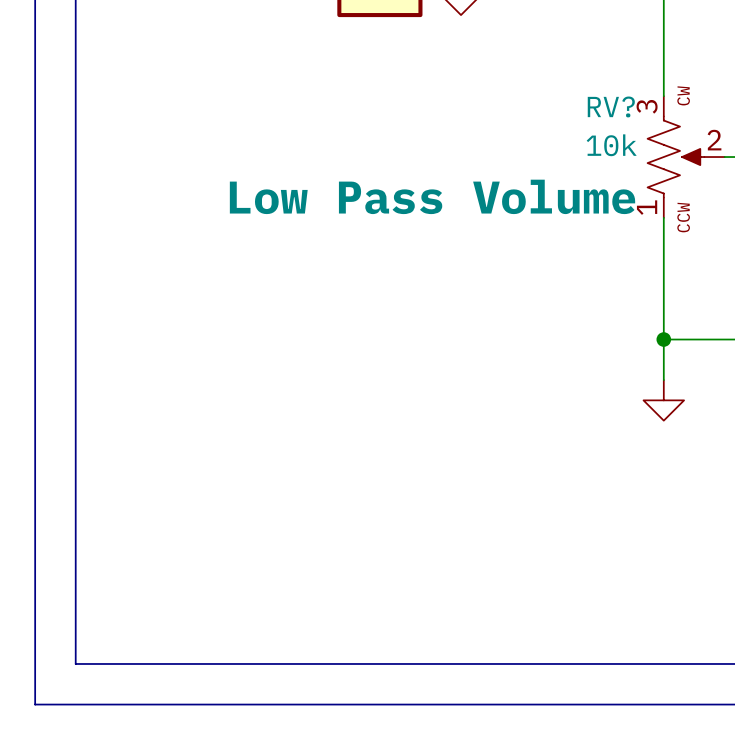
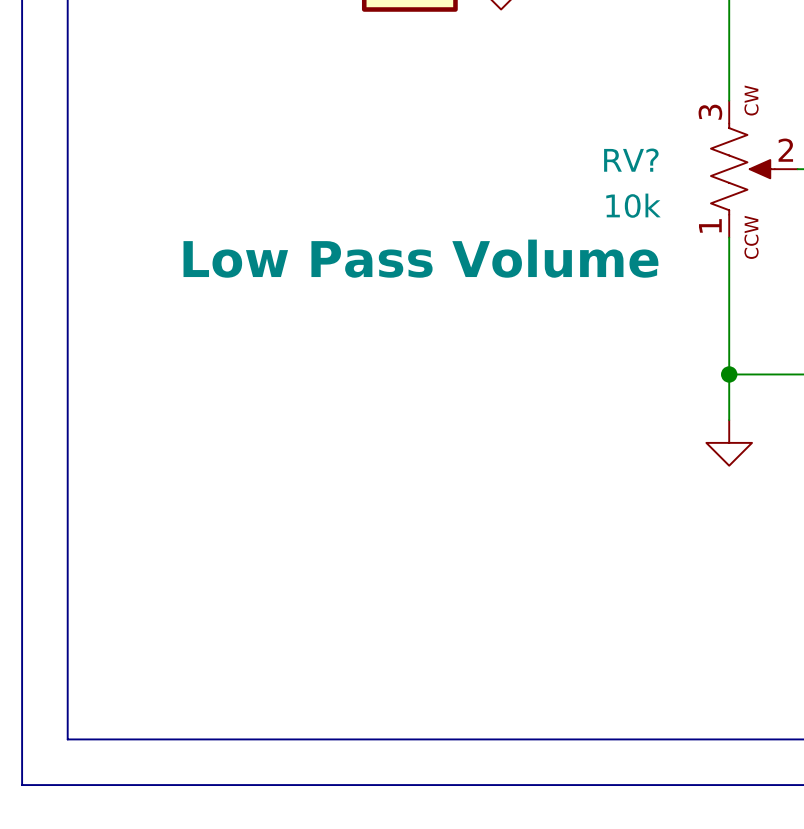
RV? name position: RV? (611, 106) -> RV? (631, 160)
RV? value position: 10k (611, 145) -> 10k (633, 205)
RV? text position: Low Pass Volume (432, 196) -> Low Pass Volume (420, 258)

